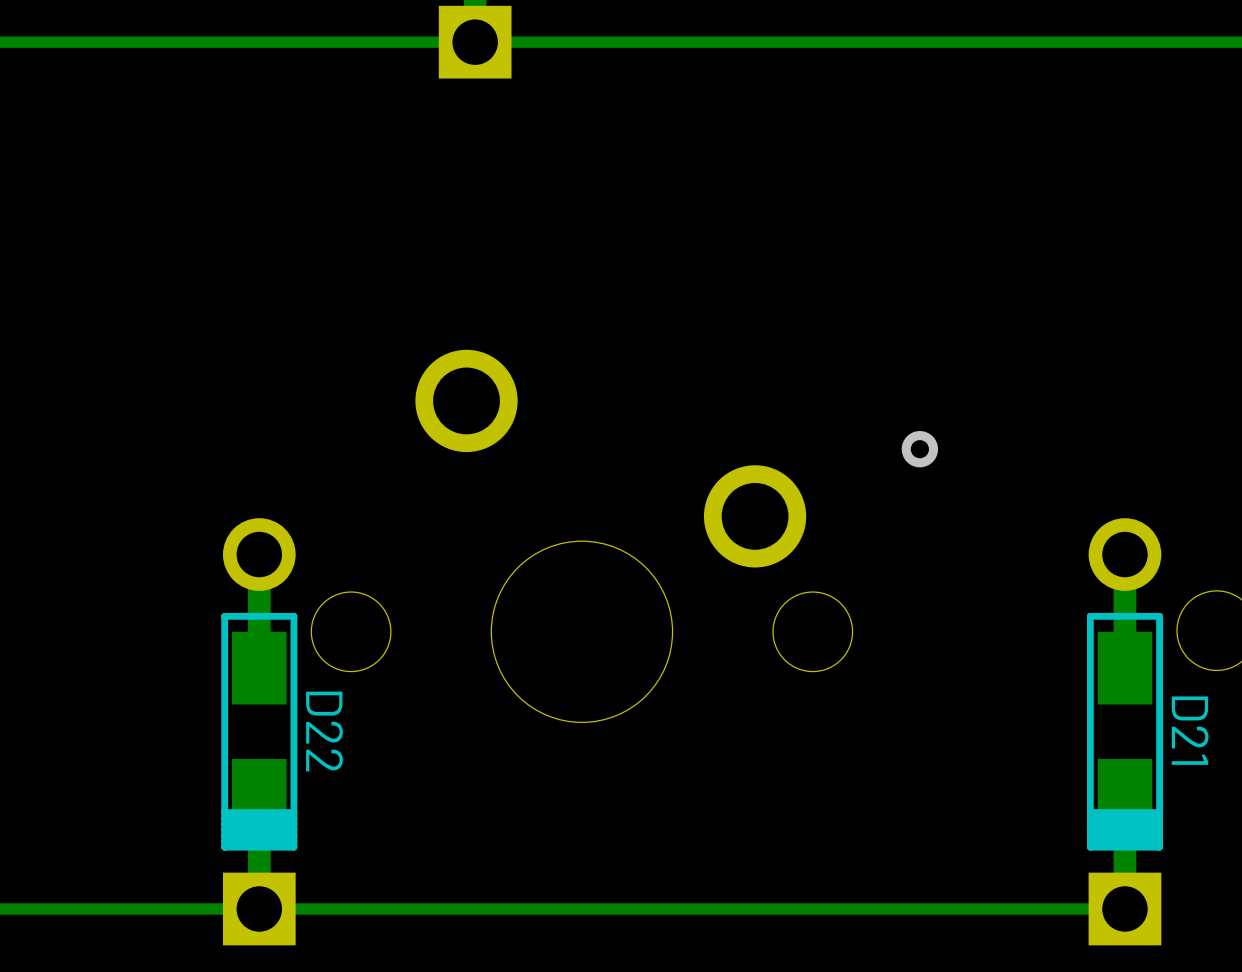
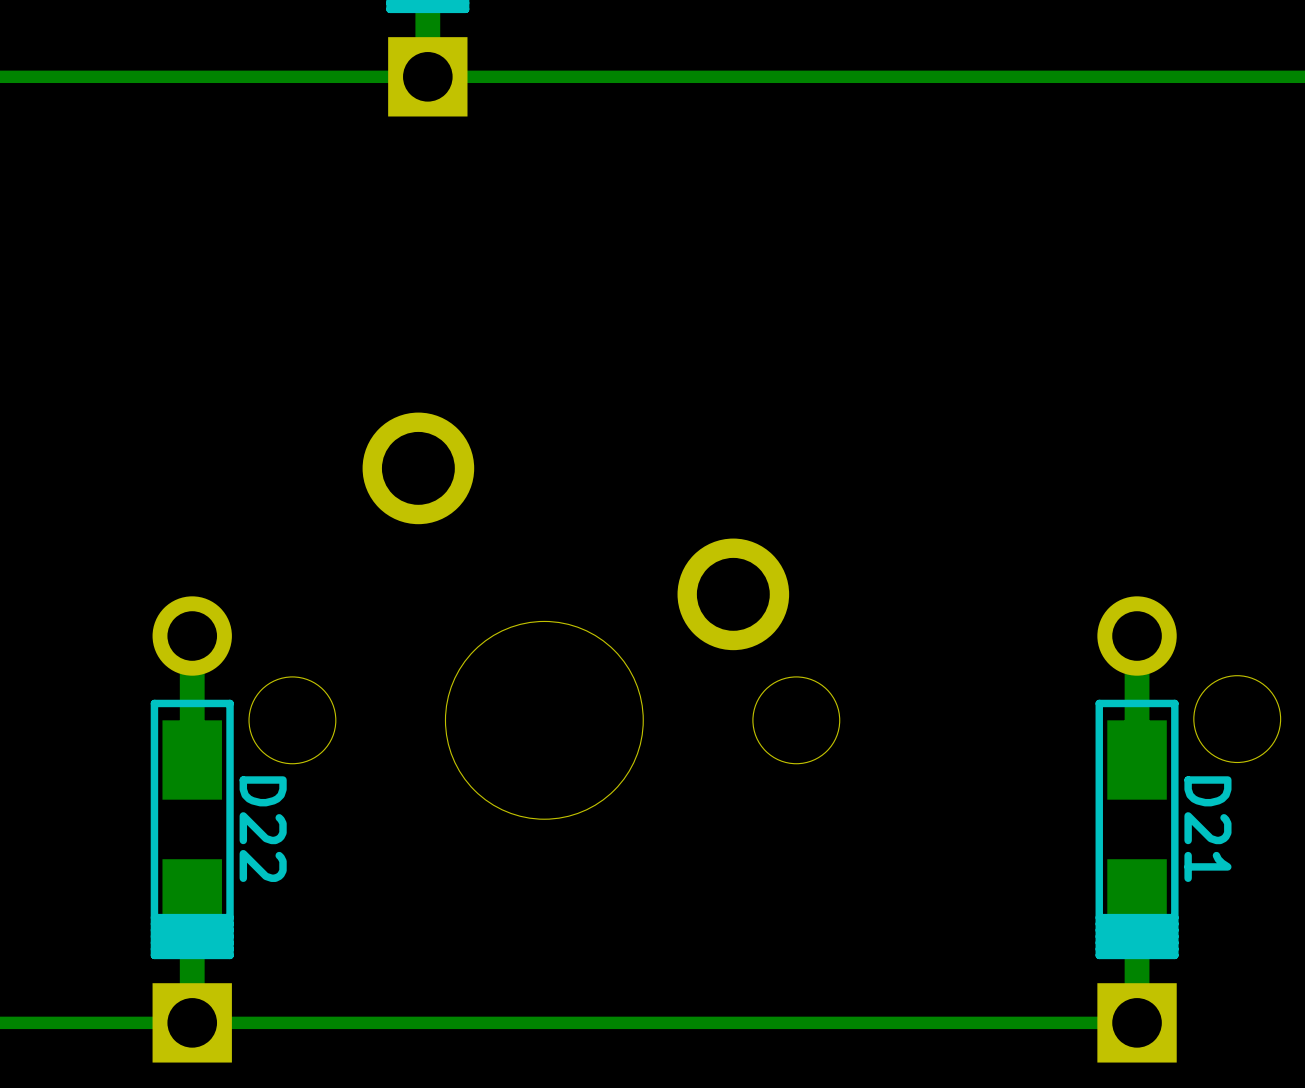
via: (919, 449) -> none

